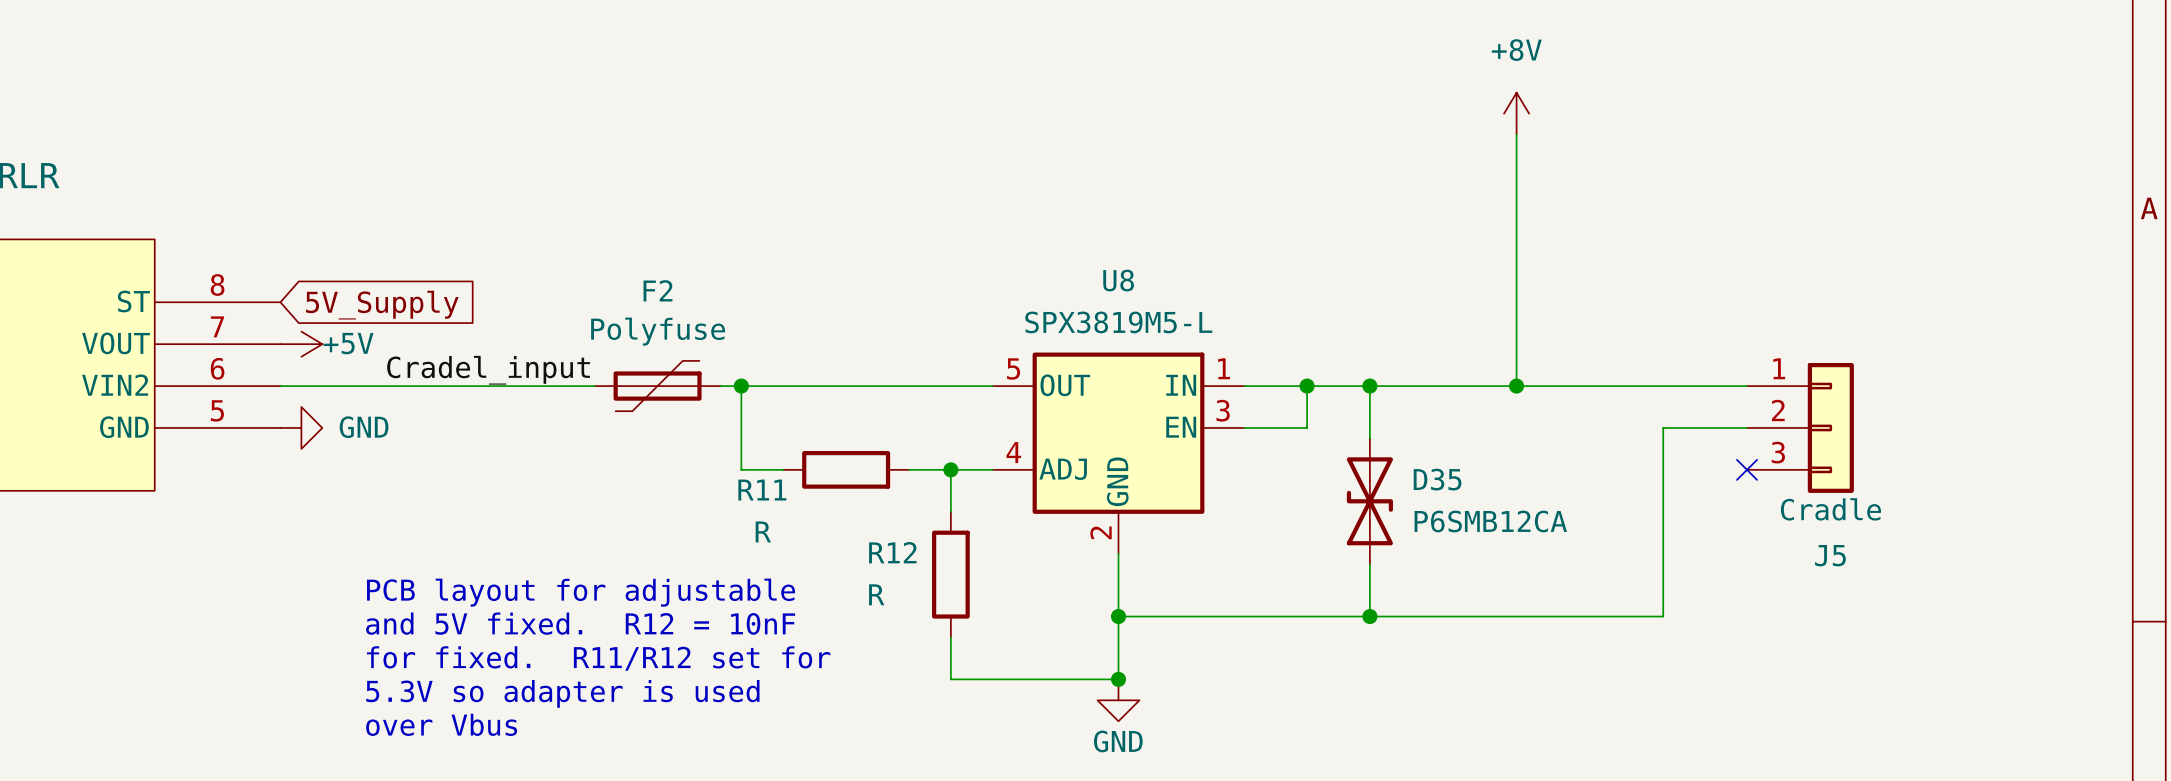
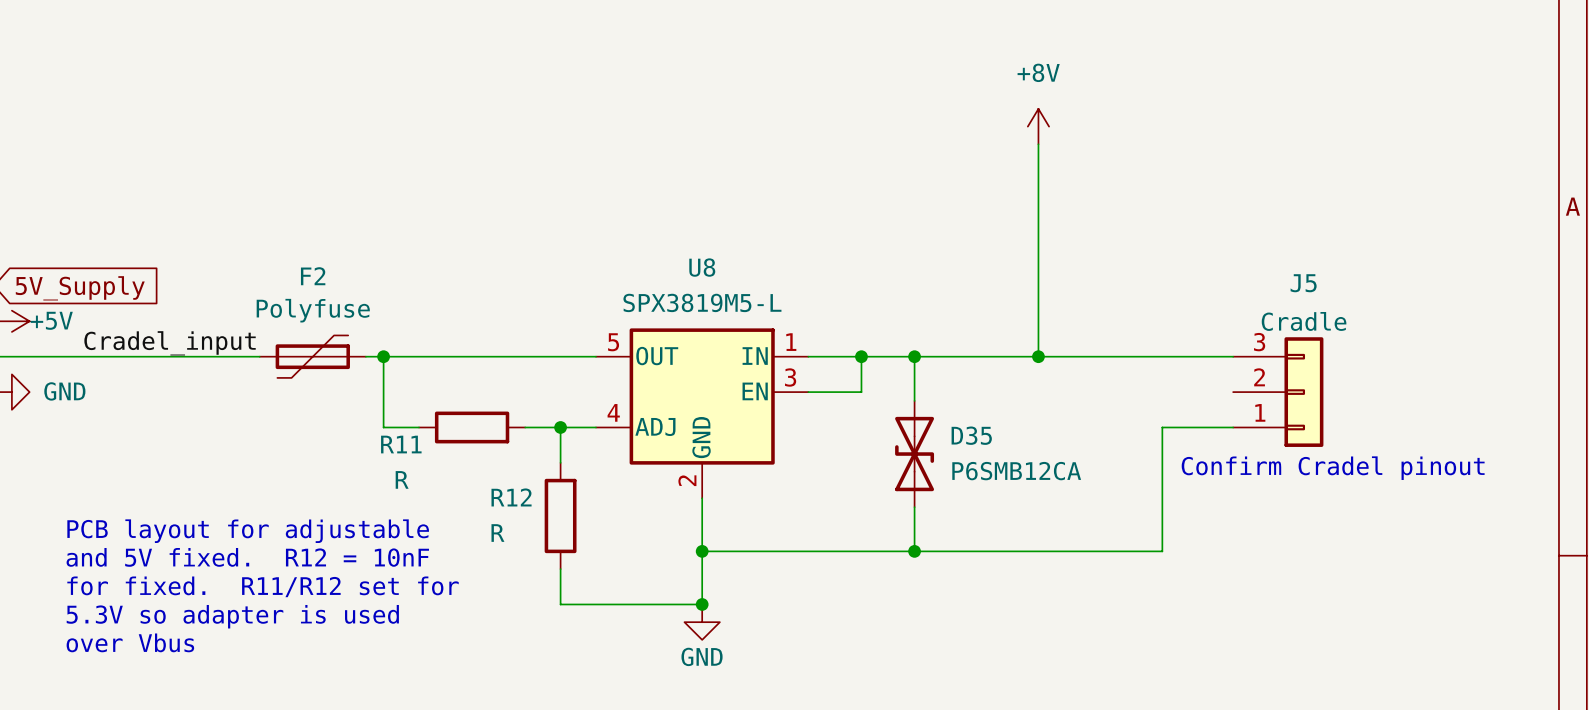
wire: (1747, 427) (1663, 427) (1663, 469) -> (1233, 427) (1162, 427)
J5 flip: as is (1830, 427) -> up-down (1303, 392)
no-connect mark: (1747, 469) -> none
text: none -> Confirm Cradel pinout (1333, 468)

